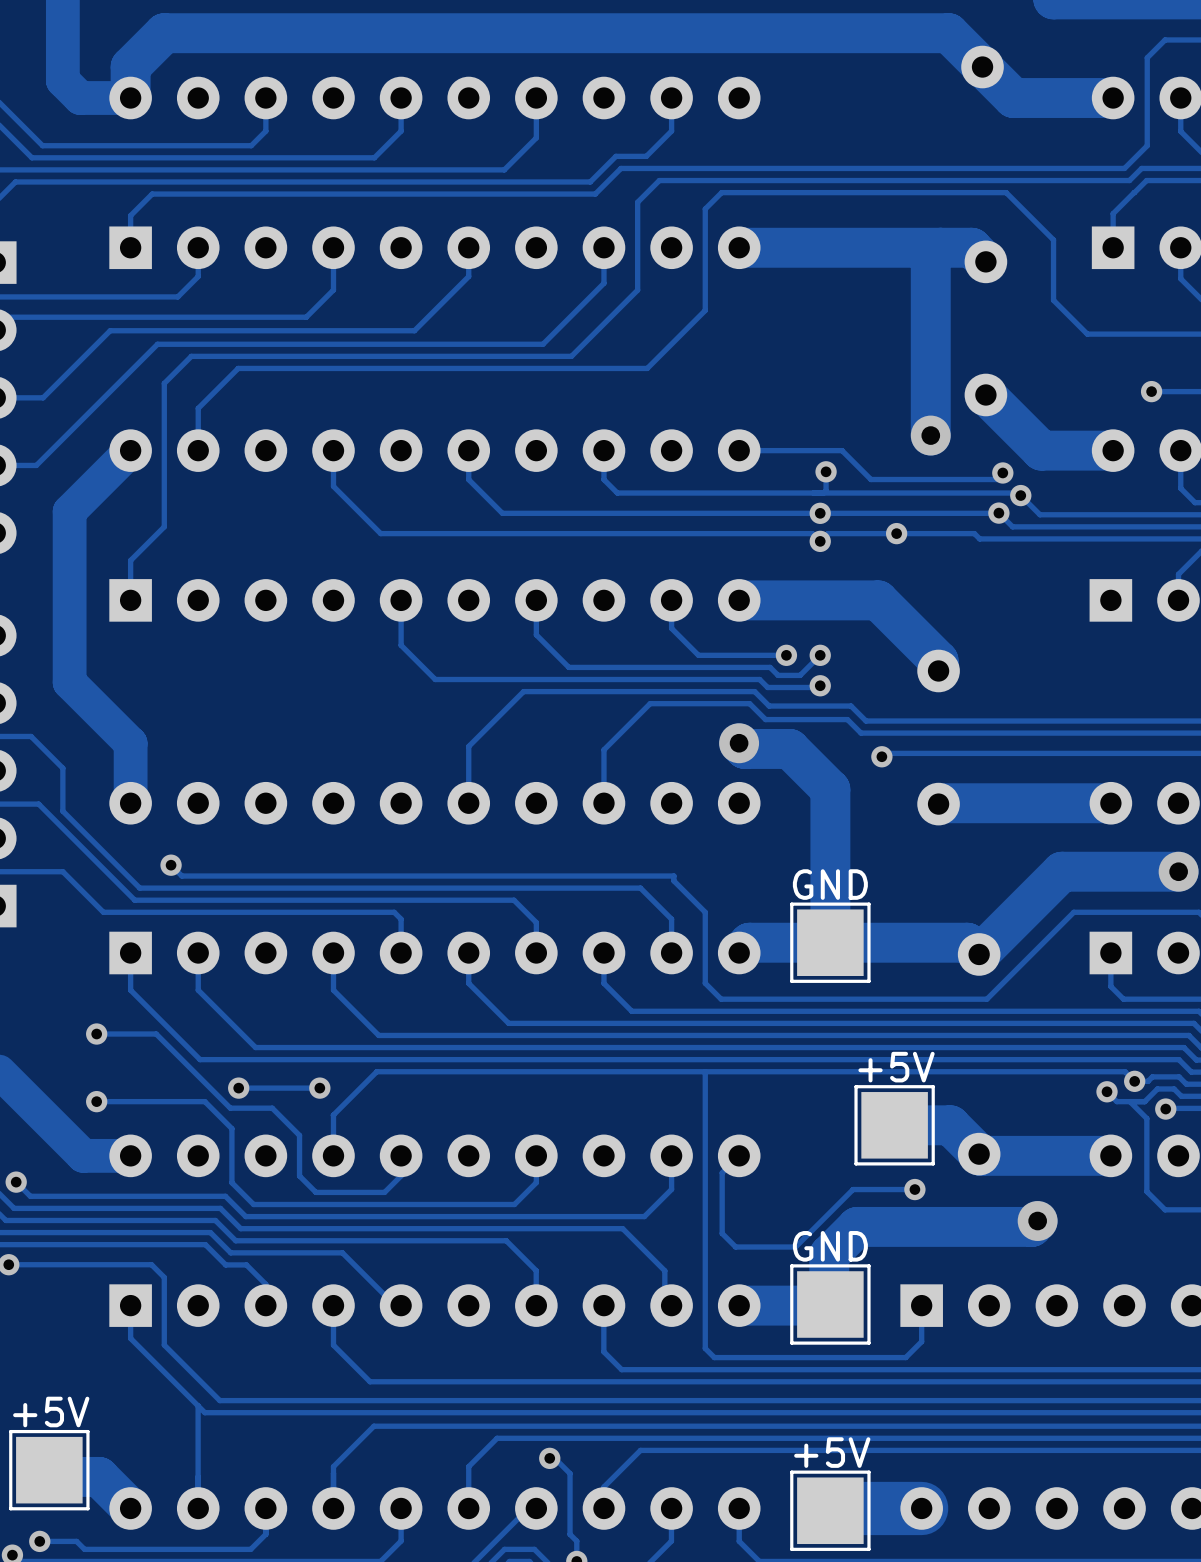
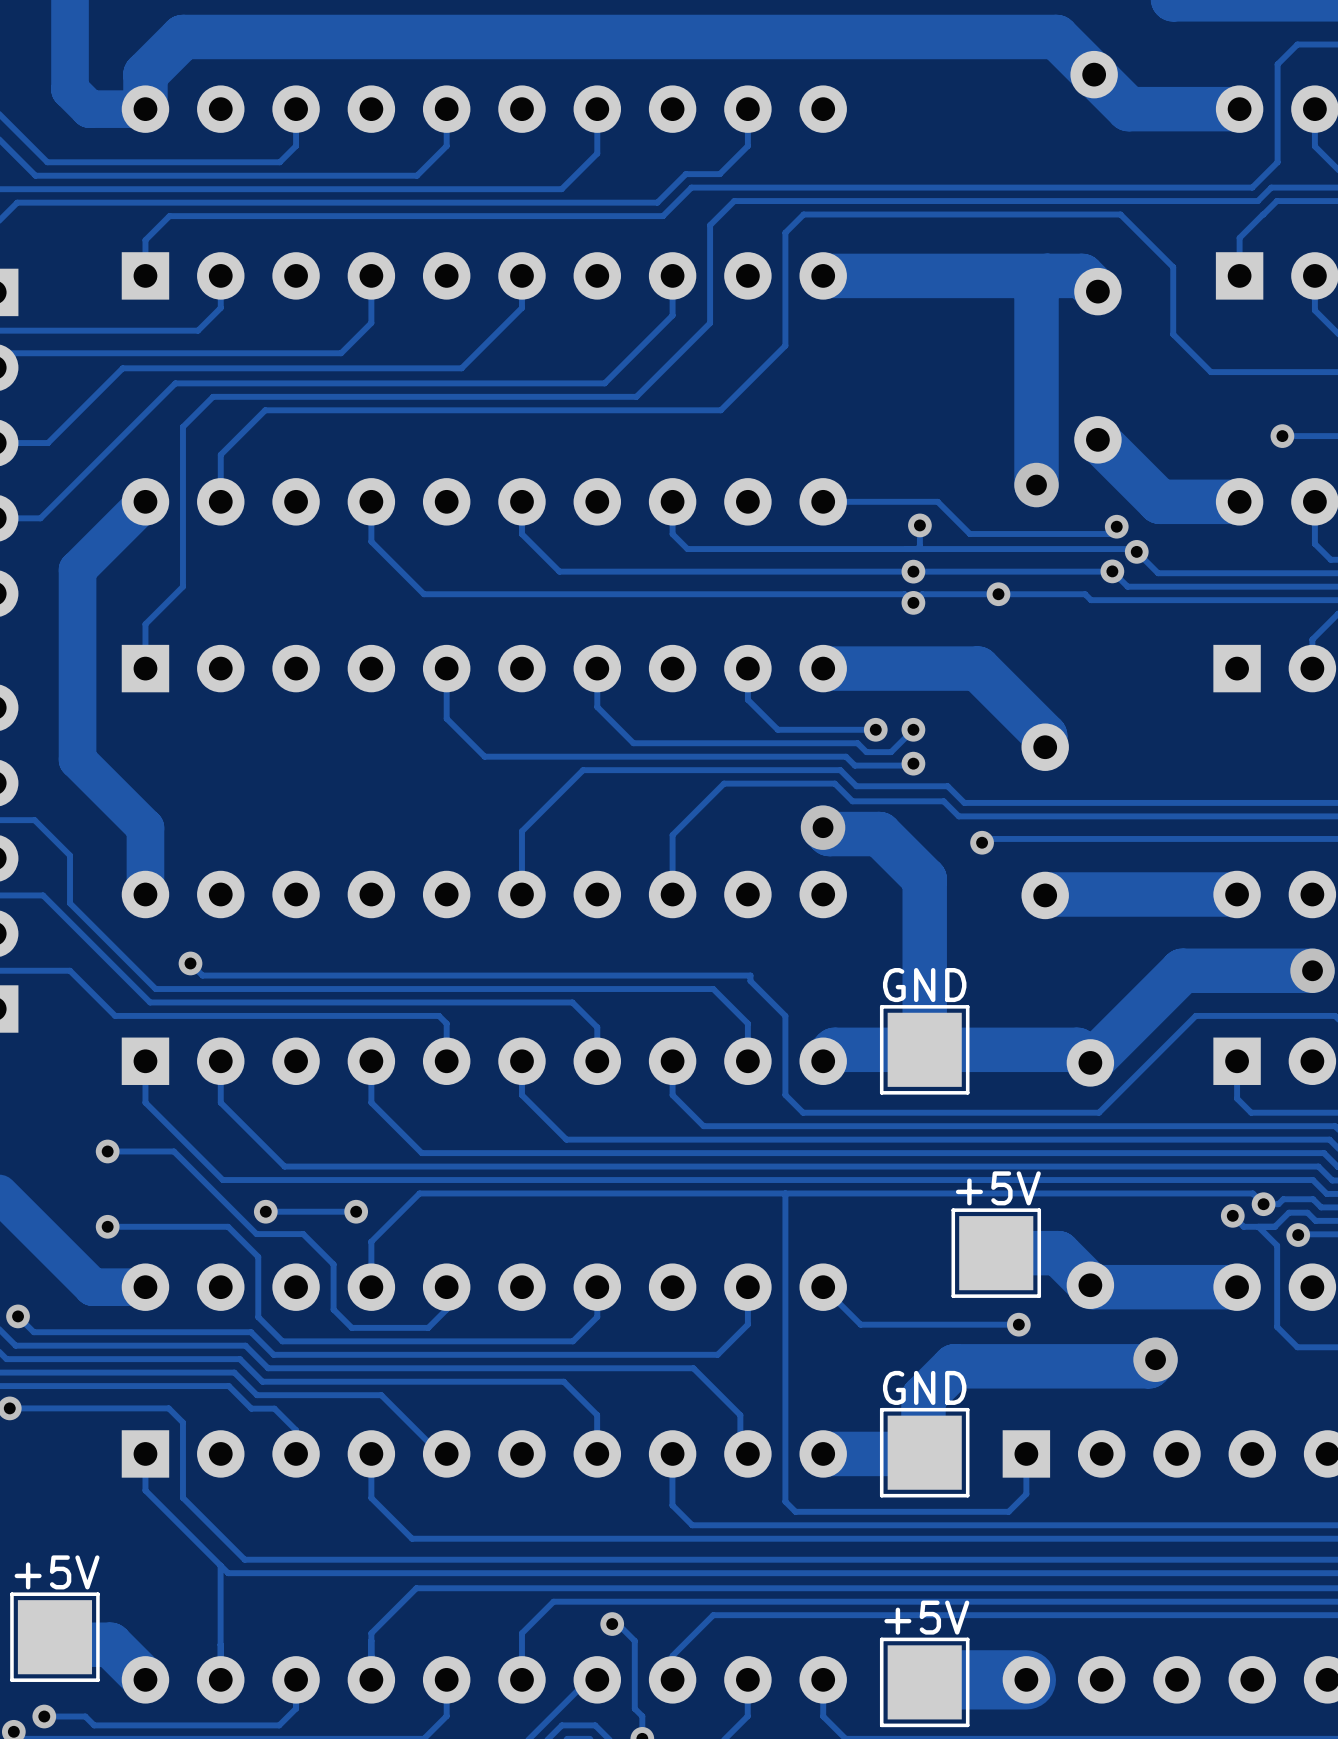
track: (739, 1155) (722, 1172) (722, 1233) (735, 1247) (795, 1247) (853, 1189) -> (823, 1287) (860, 1324) (949, 1324)

